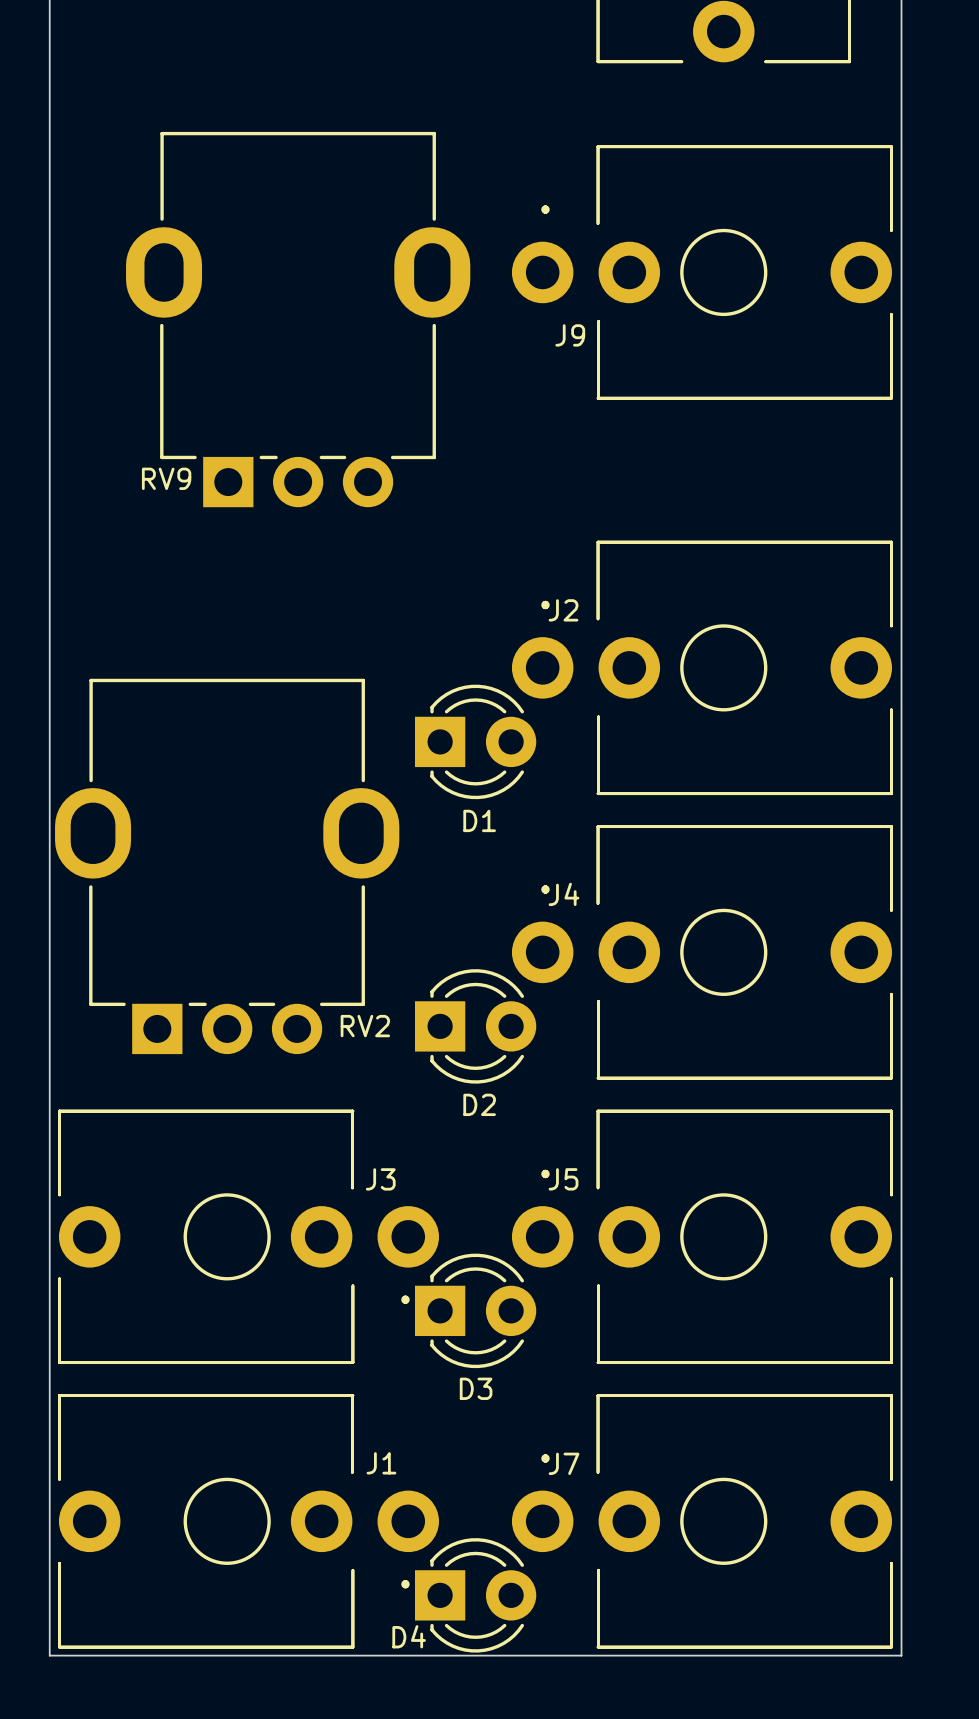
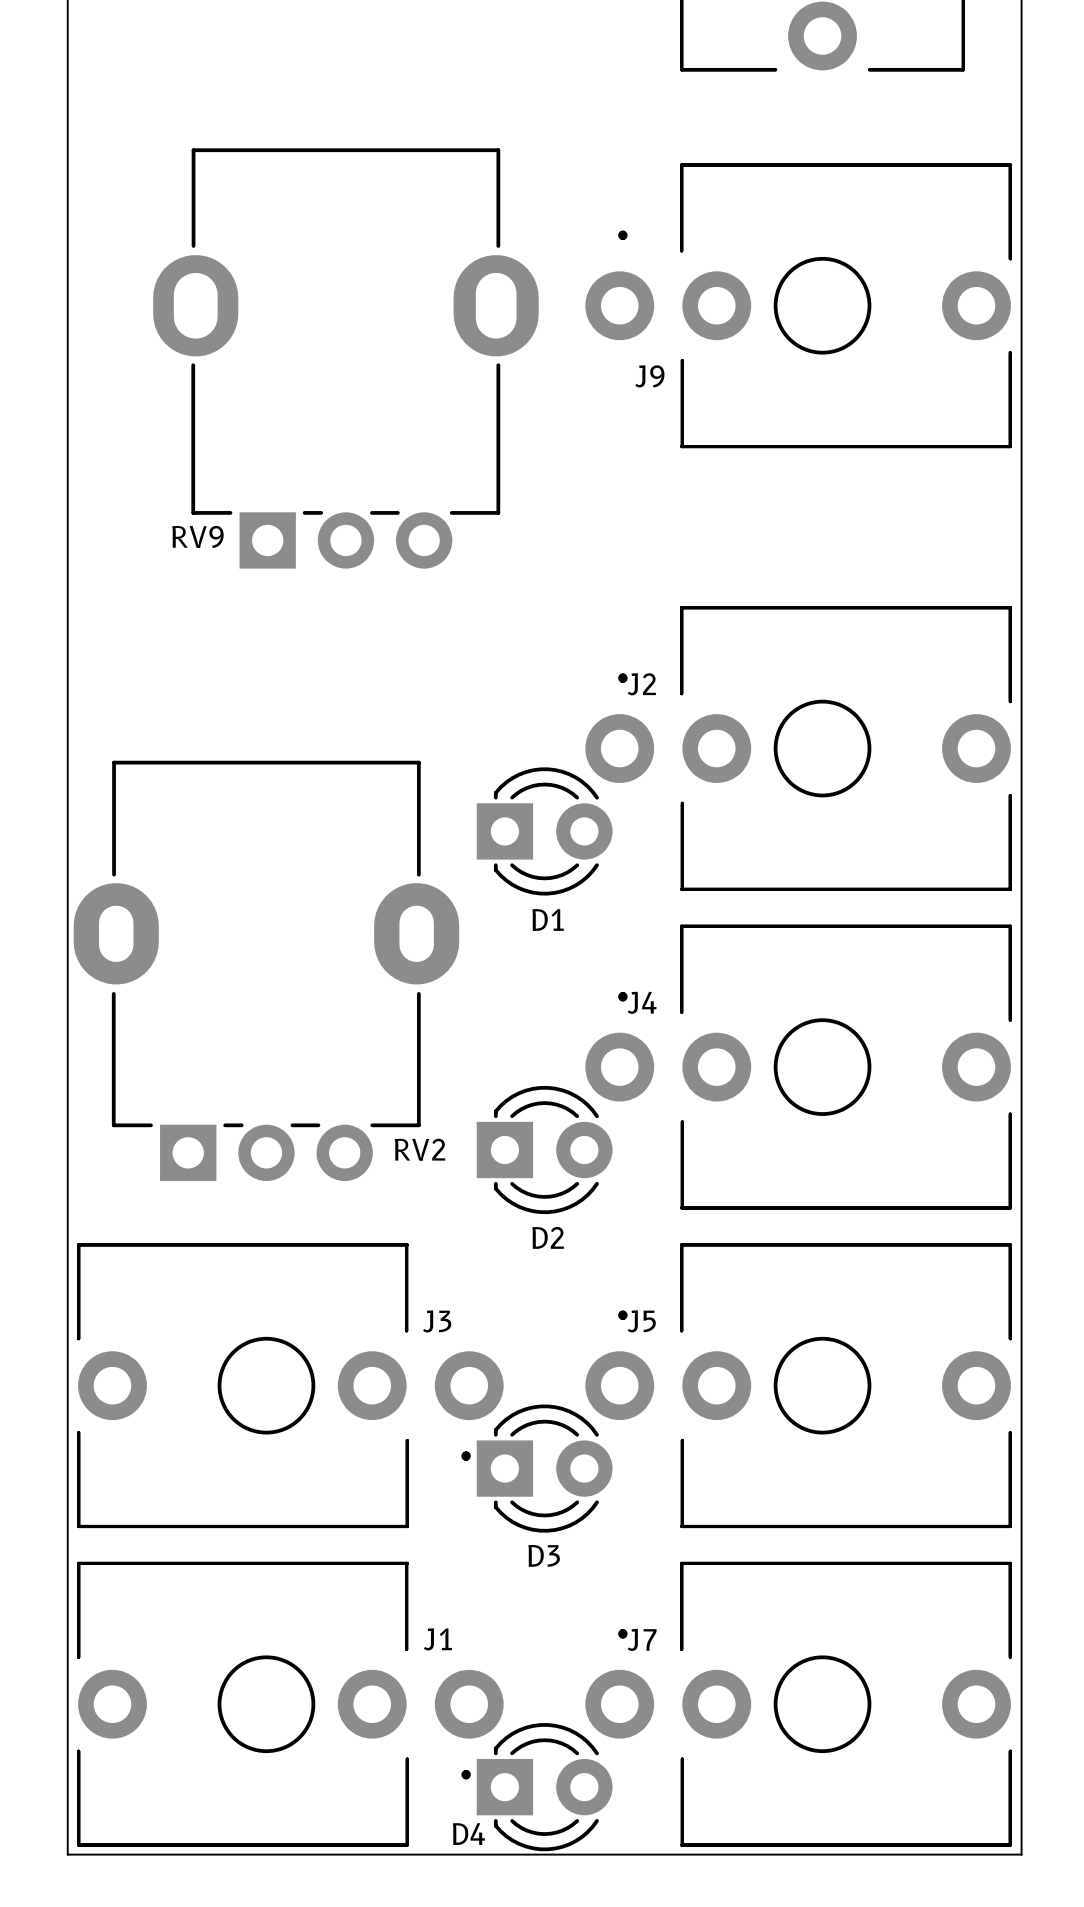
RV2 footprint: [55, 678, 400, 1055] -> [73, 760, 460, 1182]

